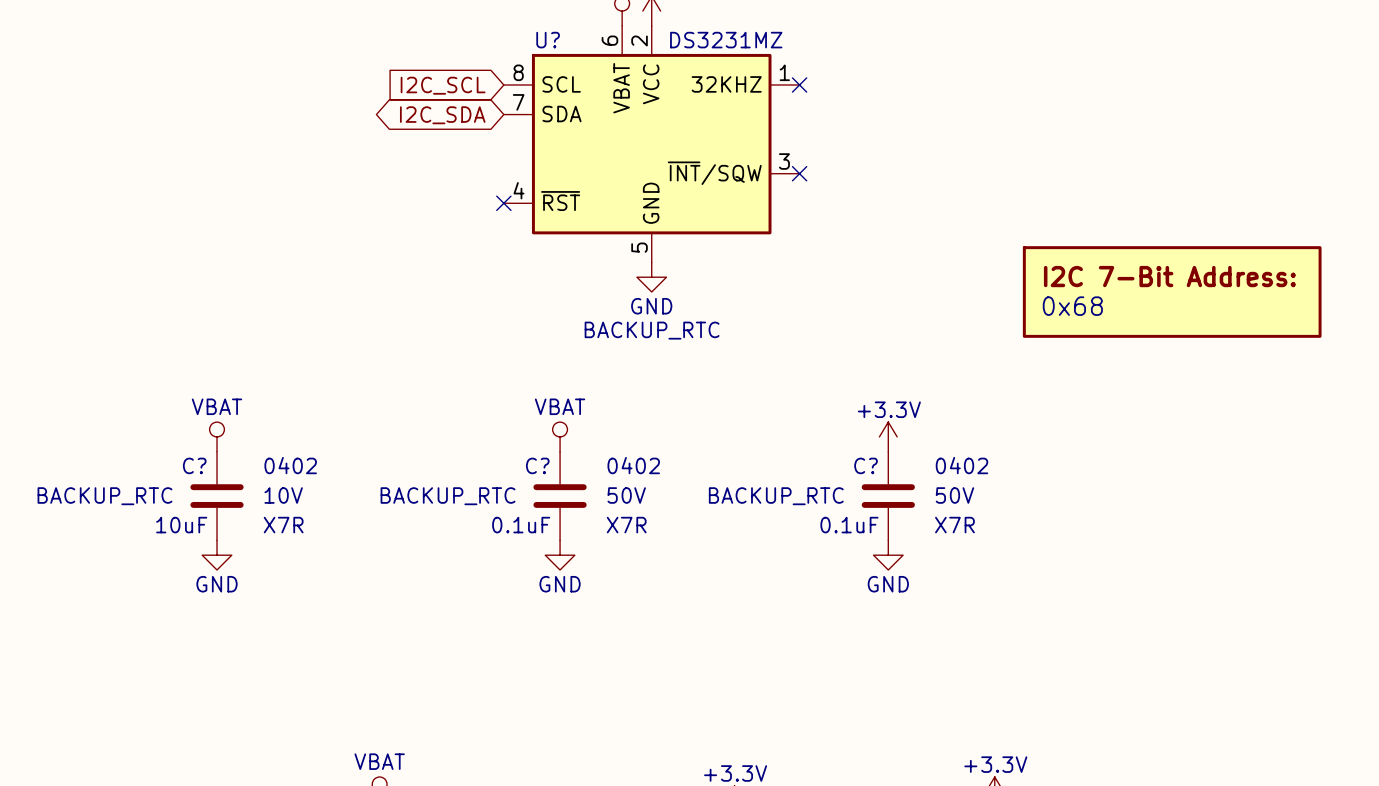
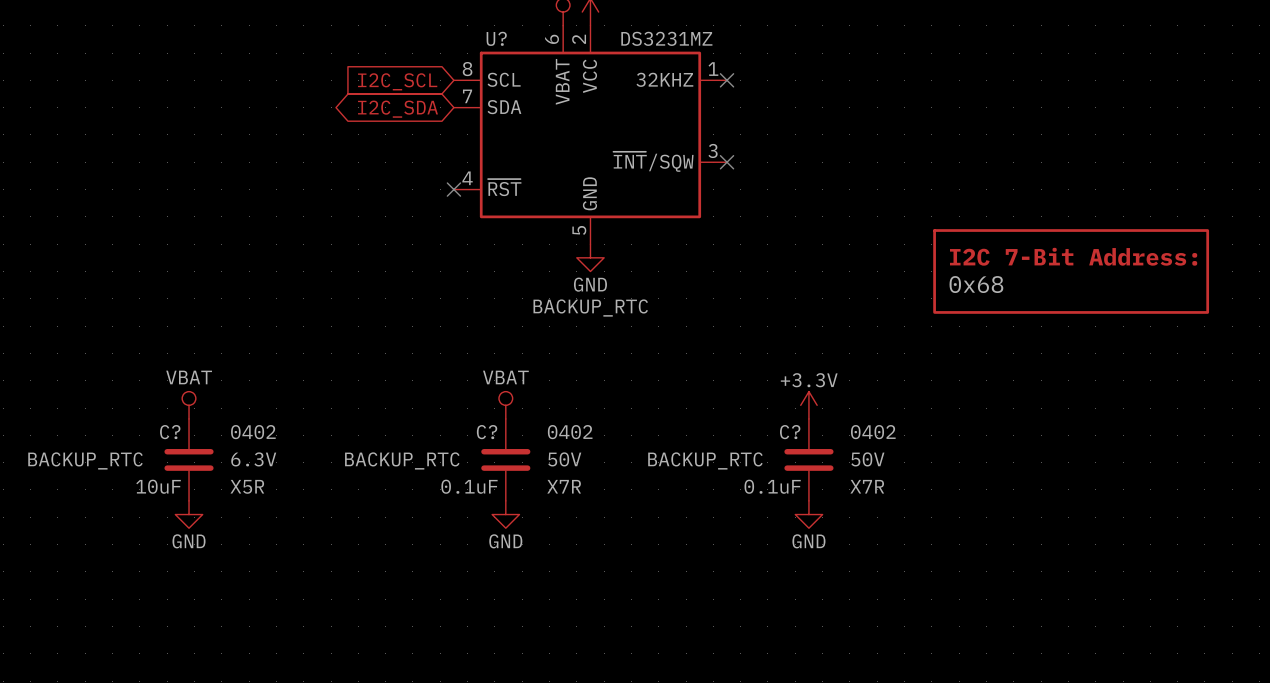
C? text: 10V (283, 495) -> 6.3V (253, 459)
C? text: X7R (283, 525) -> X5R (247, 486)

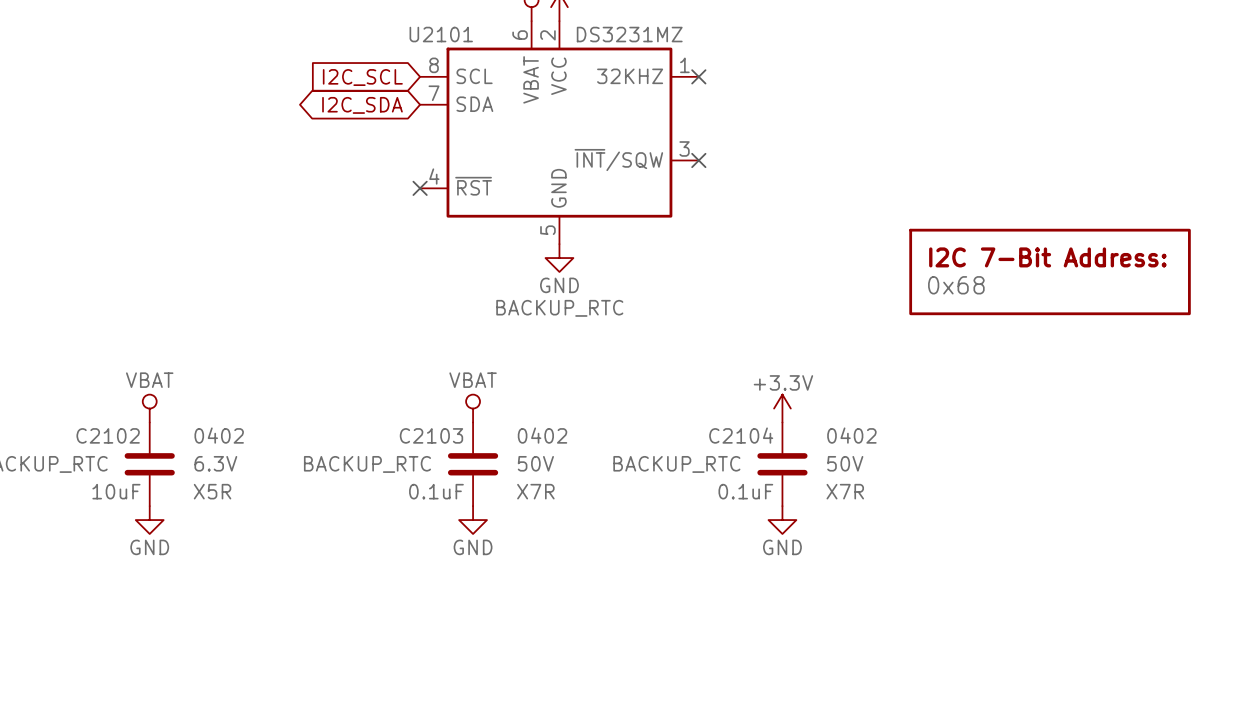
U? name: U? (496, 38) -> U2101 (441, 34)
C? name: C? (170, 432) -> C2102 (108, 435)
C? name: C? (487, 432) -> C2103 (431, 435)
C? name: C? (790, 432) -> C2104 (741, 435)

